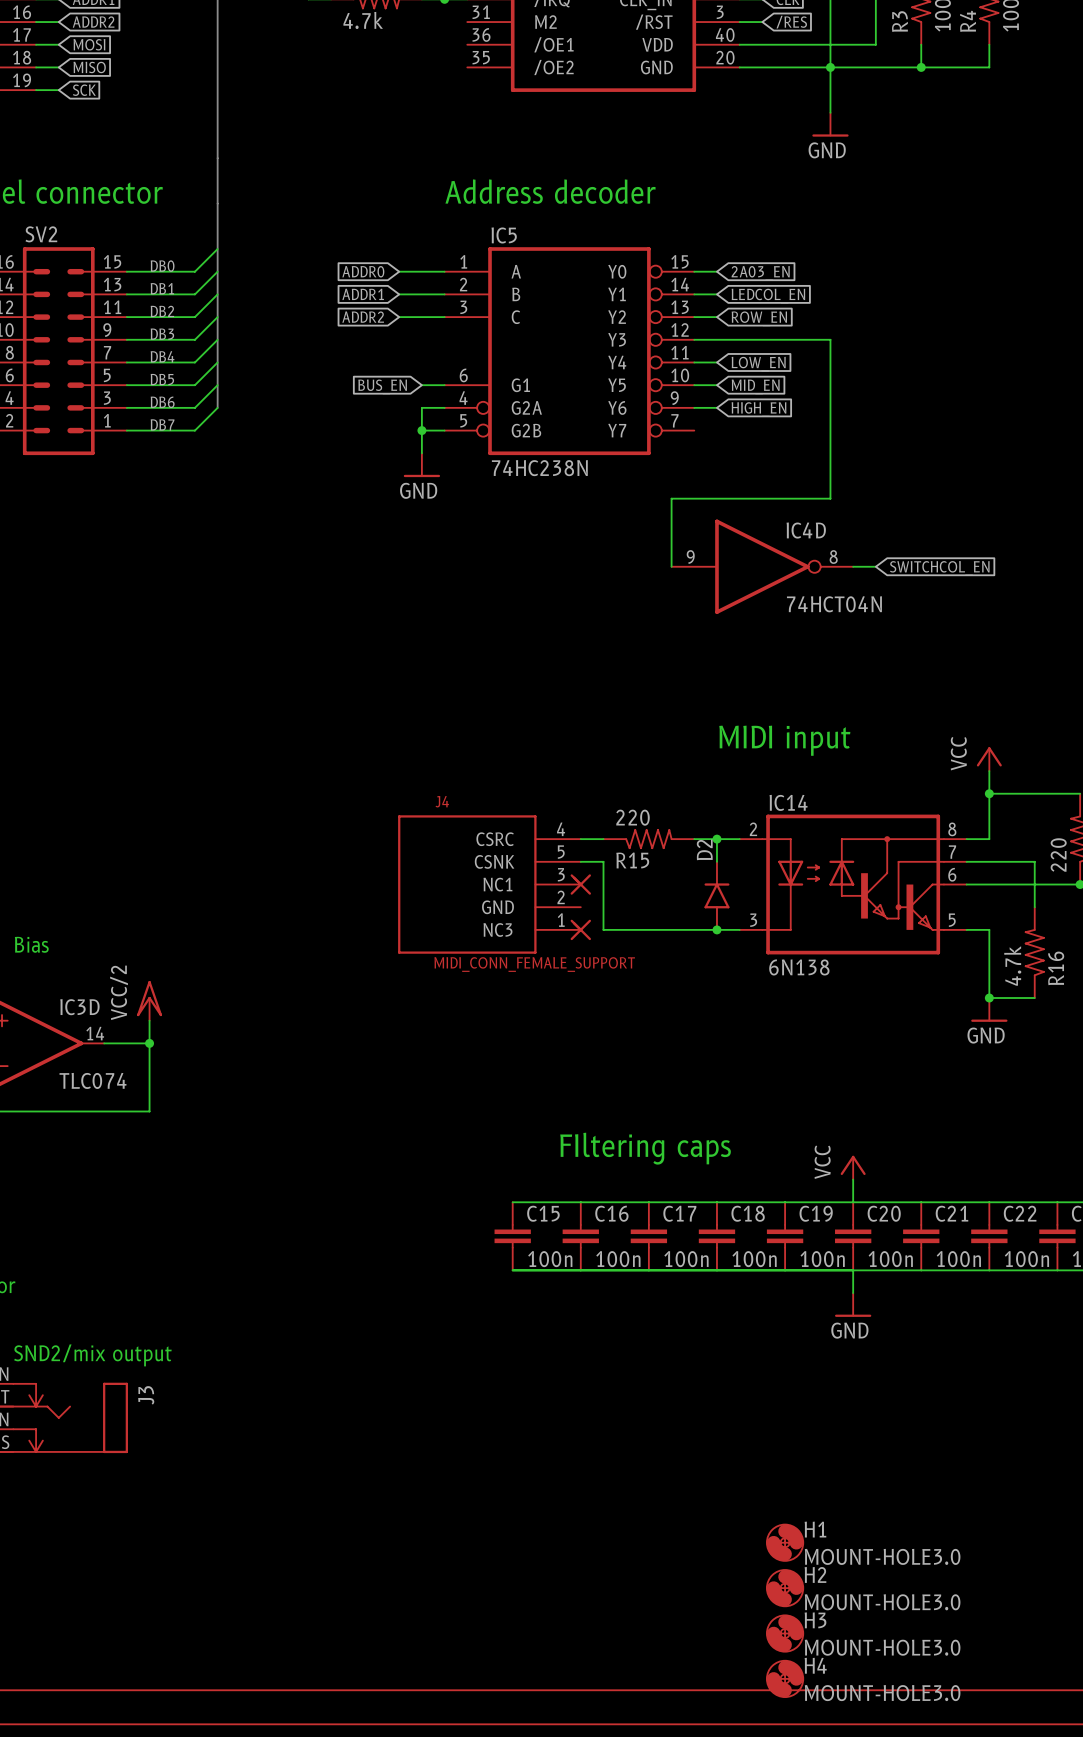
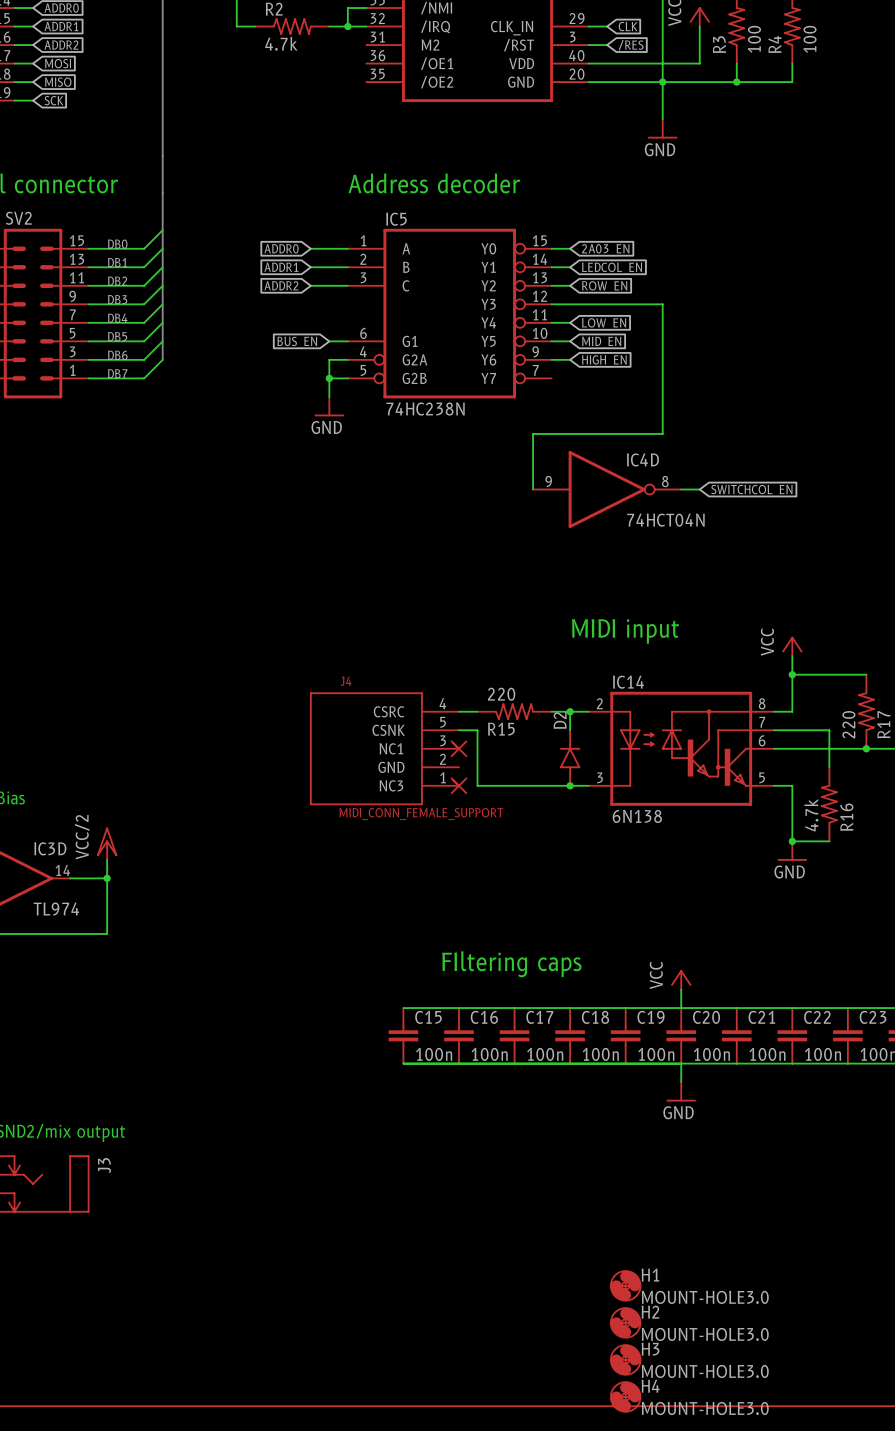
IC3D value: TLC074 (93, 1080) -> TL974 (56, 909)

